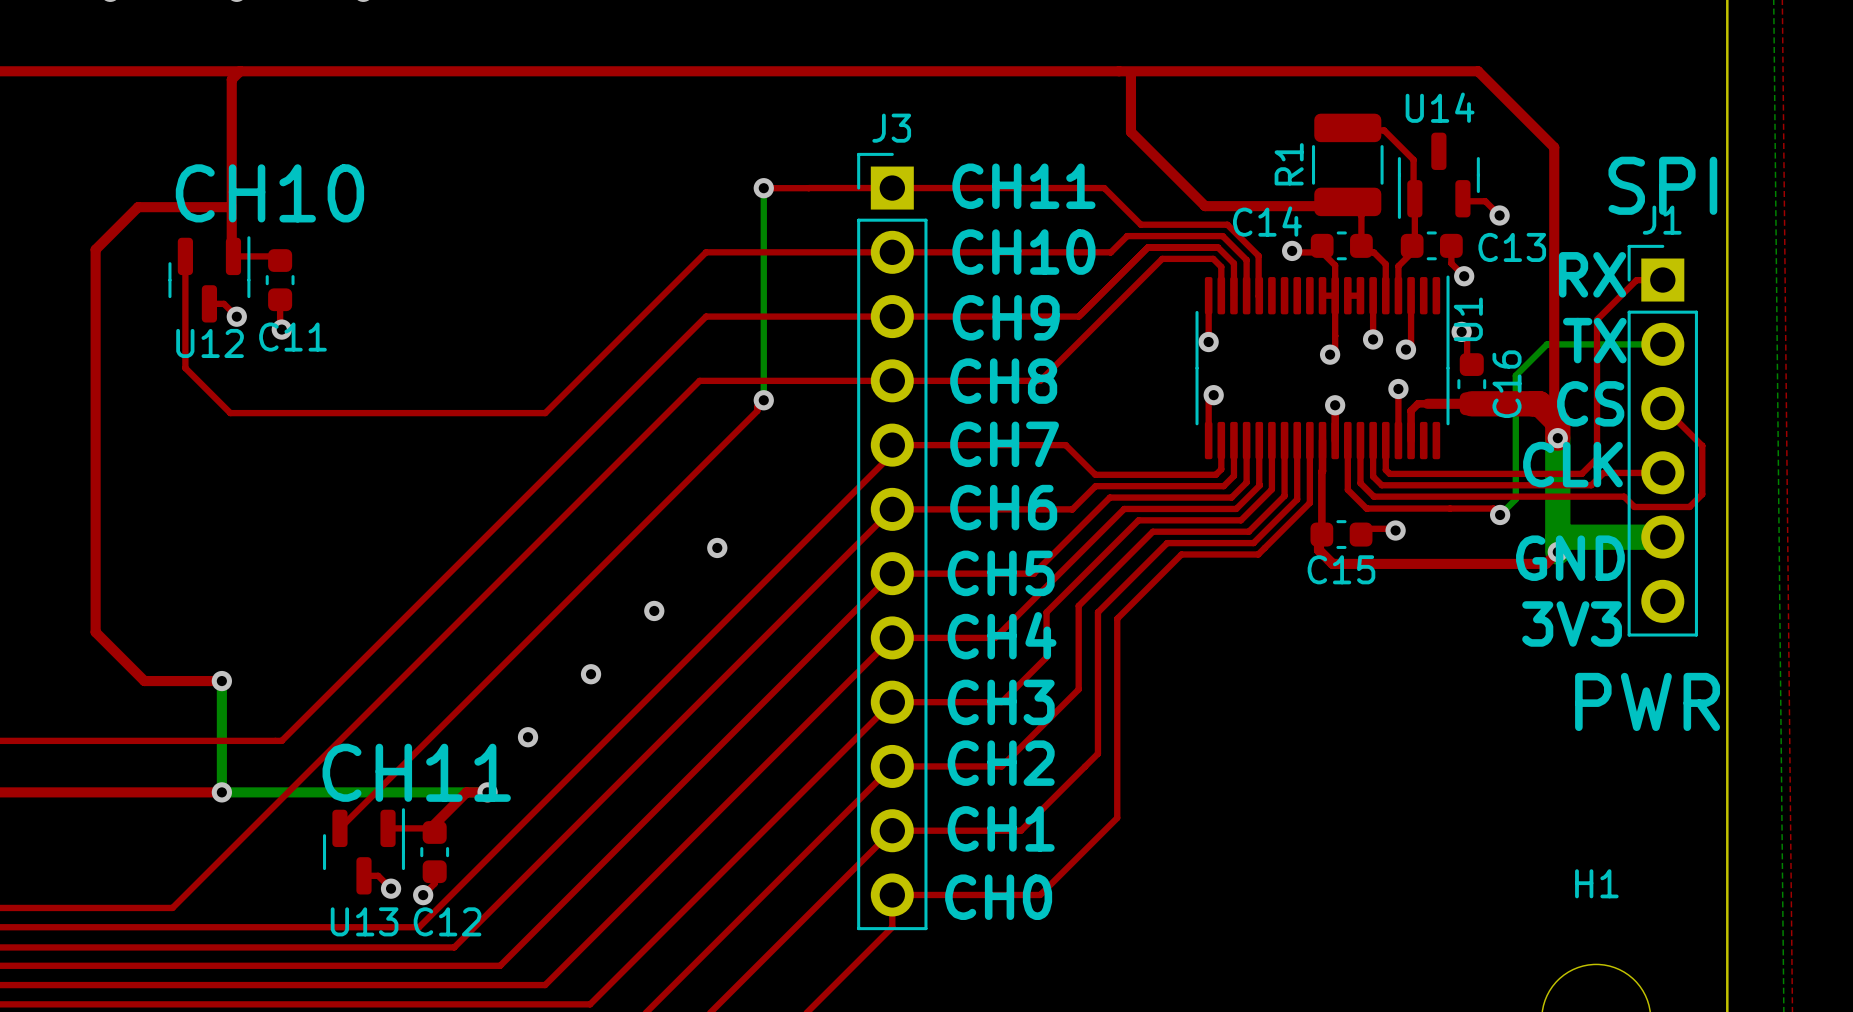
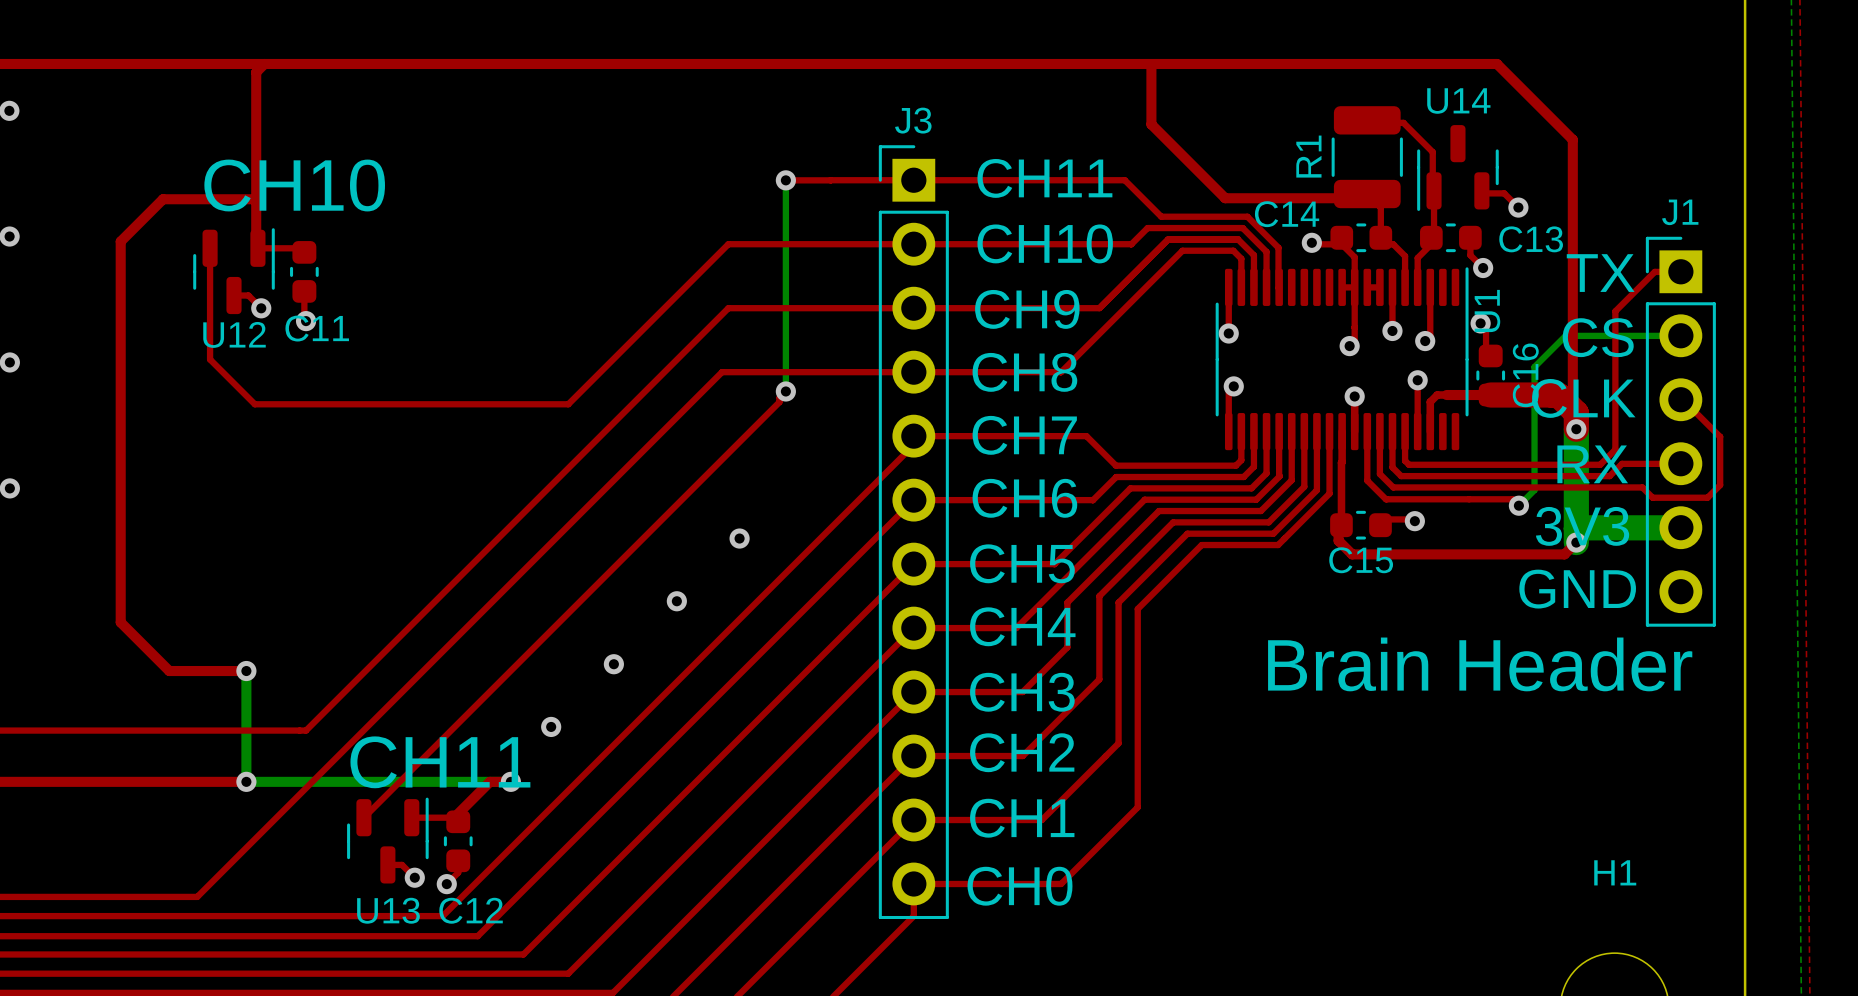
text: SPI (1662, 185) -> none
text position: RX (1592, 274) -> RX (1592, 464)
text position: TX (1594, 340) -> TX (1600, 273)
text position: CS (1590, 403) -> CS (1598, 337)
text position: CLK (1572, 464) -> CLK (1583, 398)
text position: GND (1570, 558) -> GND (1577, 589)
text position: 3V3 (1572, 623) -> 3V3 (1582, 526)
text: none -> Brain Header (1480, 664)
text: PWR (1647, 701) -> none

